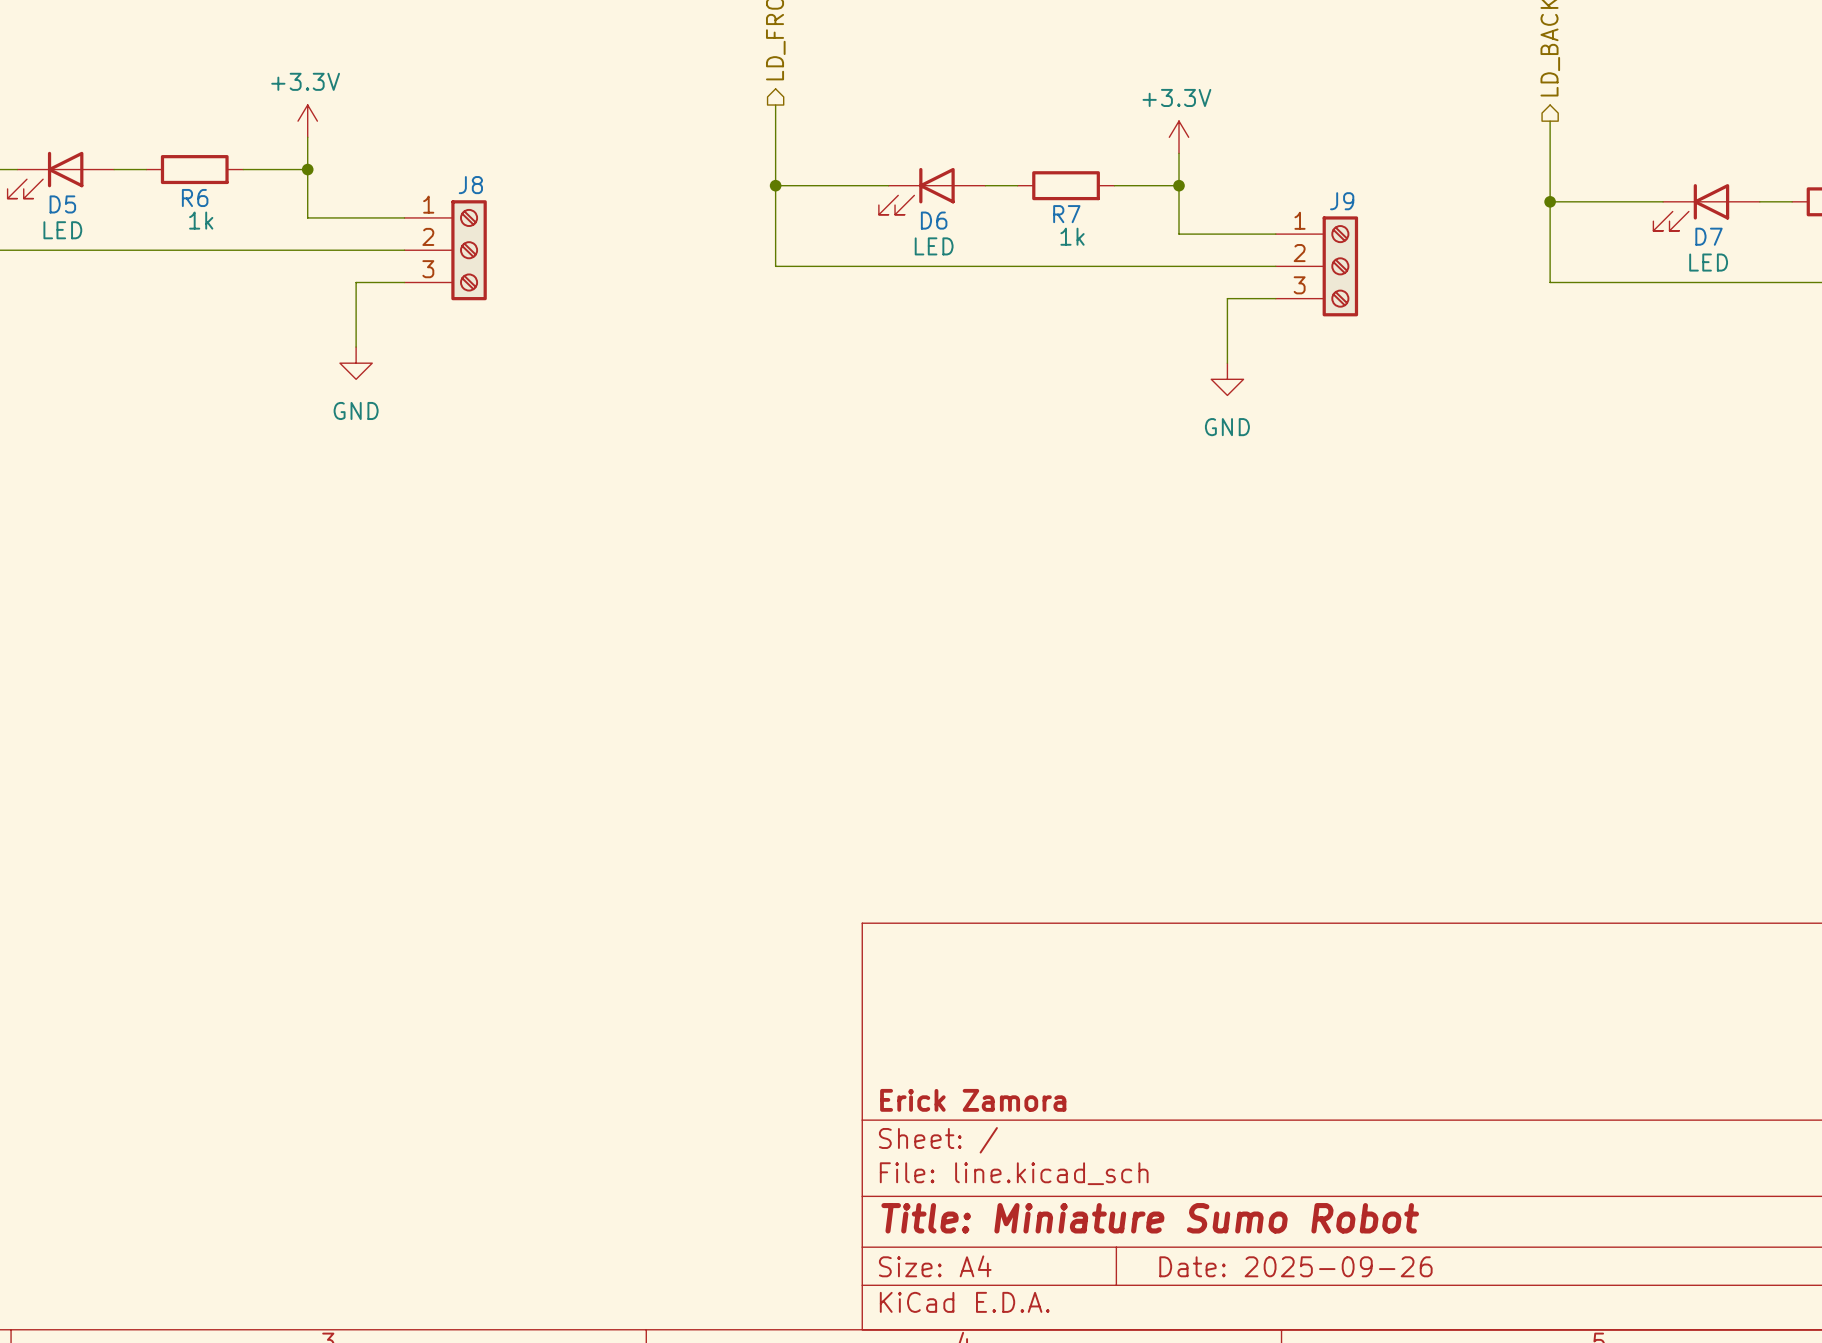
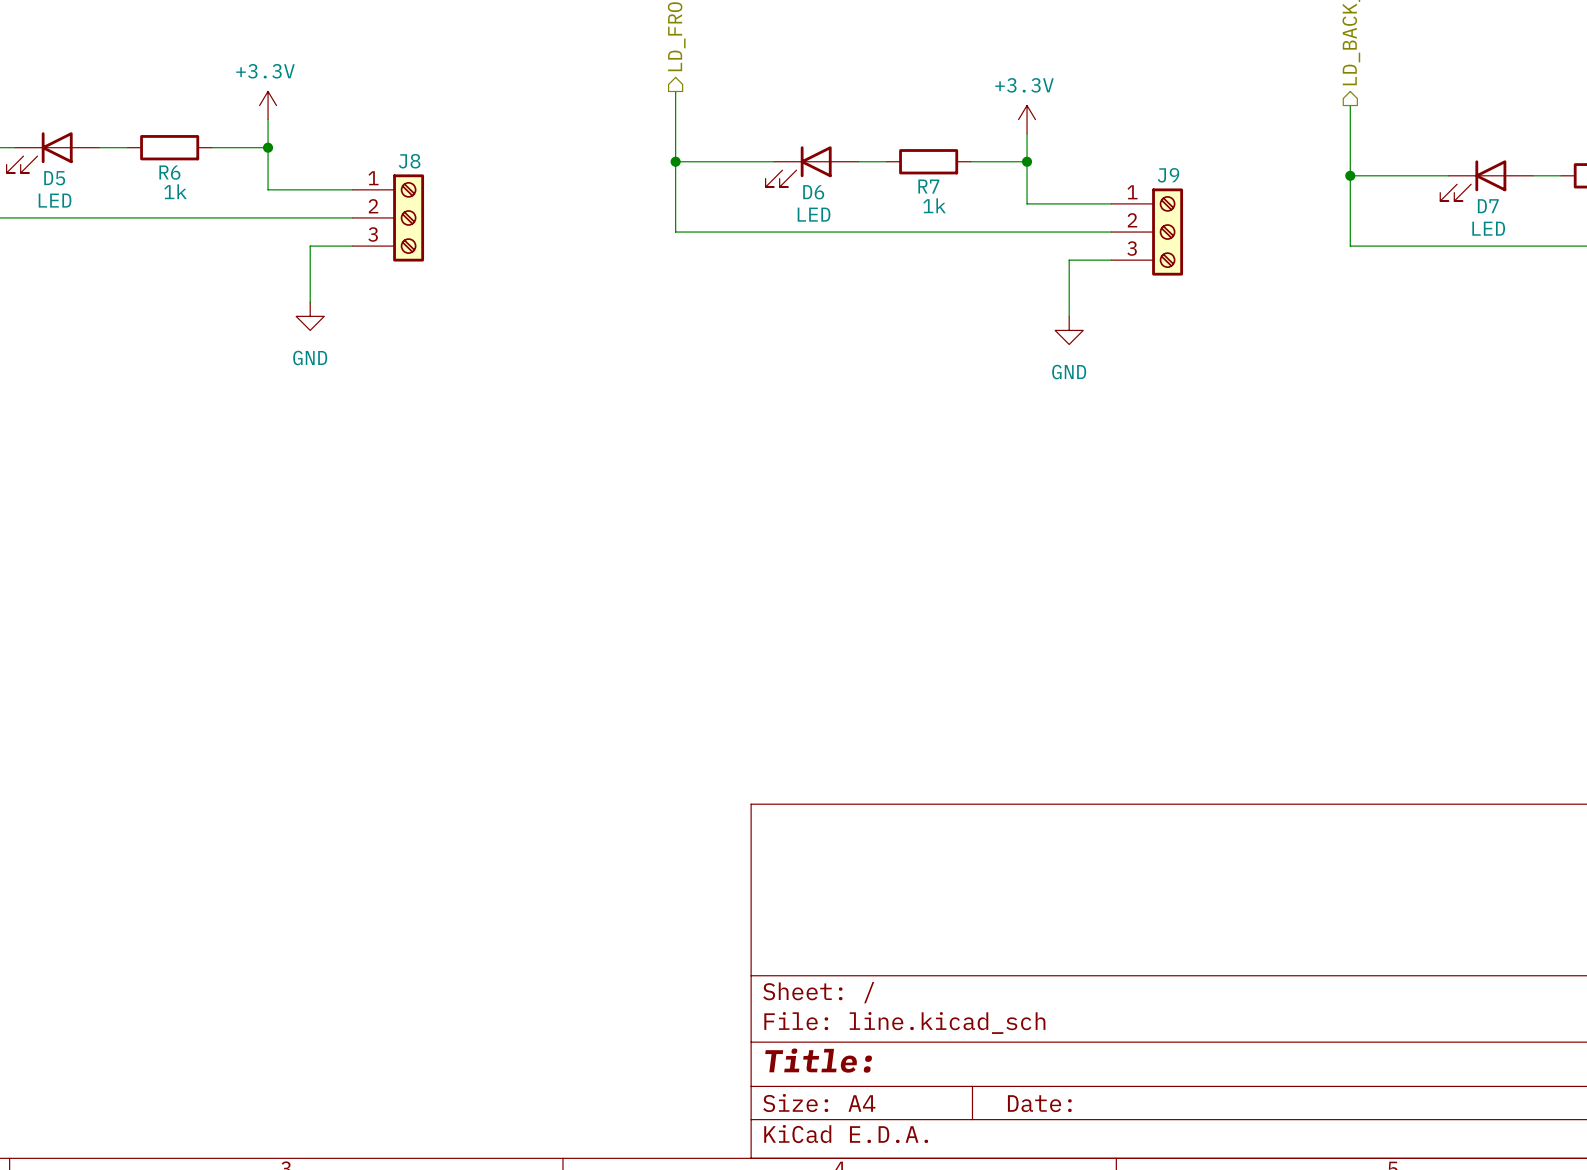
title block: Erick Zamora (973, 1100) -> none
title block: Title: Miniature Sumo Robot (1150, 1218) -> Title: (818, 1060)
title block: Date: 2025-09-26 (1295, 1266) -> Date: (1039, 1103)

